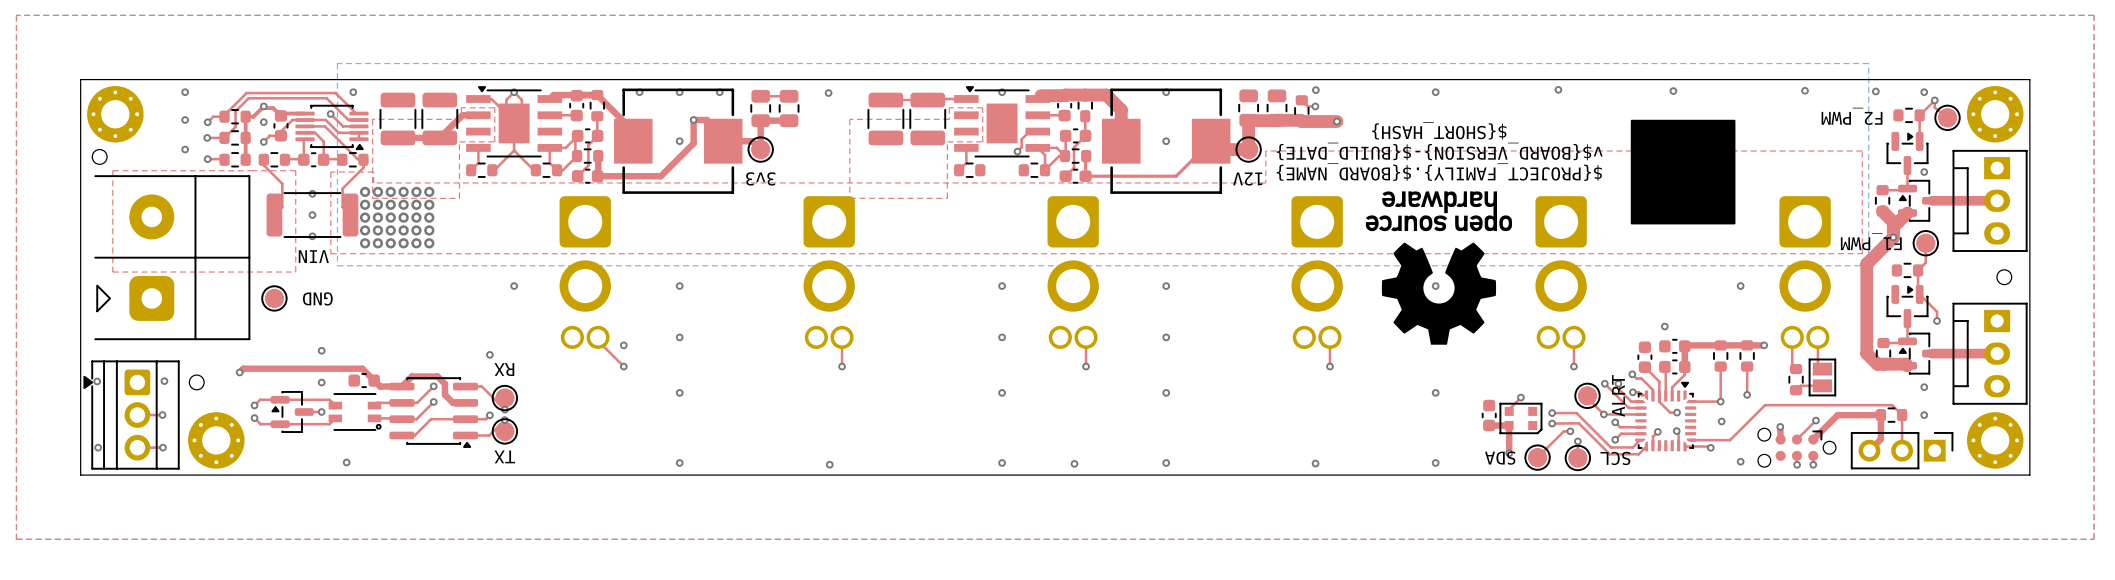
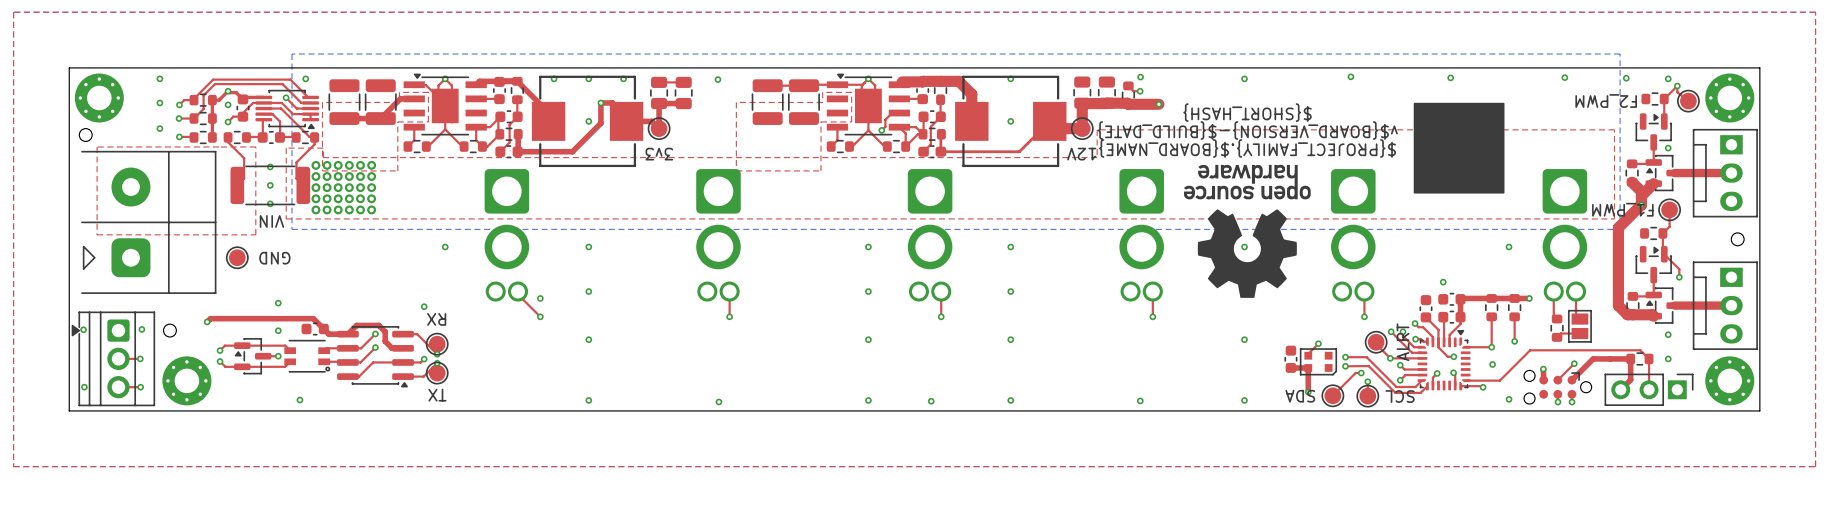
top track: none -> (837, 84) (862, 84)
top track: none -> (861, 97) (861, 85) (868, 78) (875, 85) (875, 97)
top track: none -> (868, 121) (868, 130)
top track: none -> (868, 130) (884, 146)
top track: none -> (868, 130) (852, 146)

